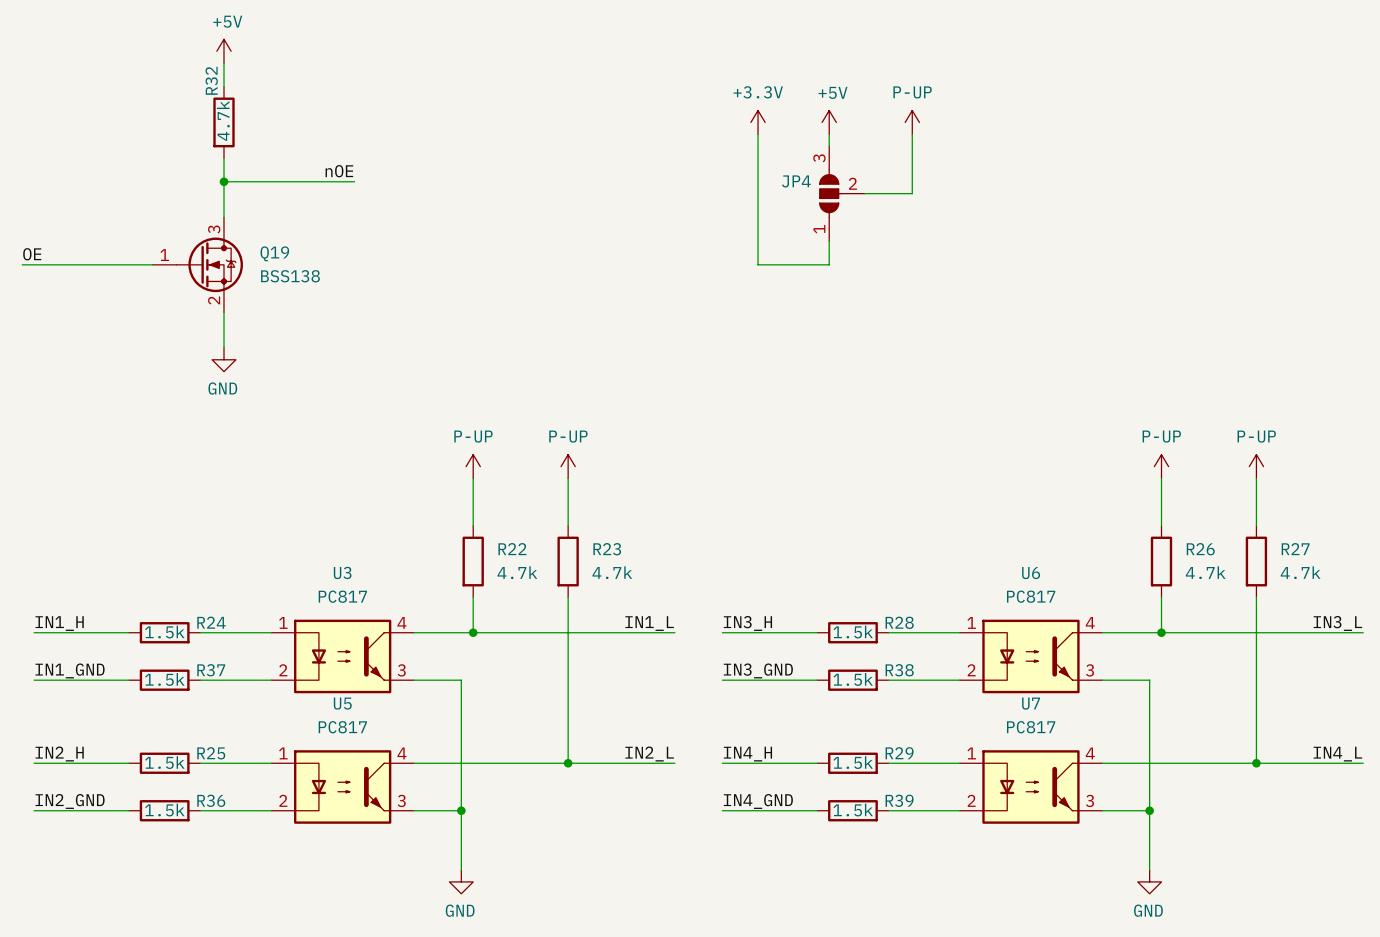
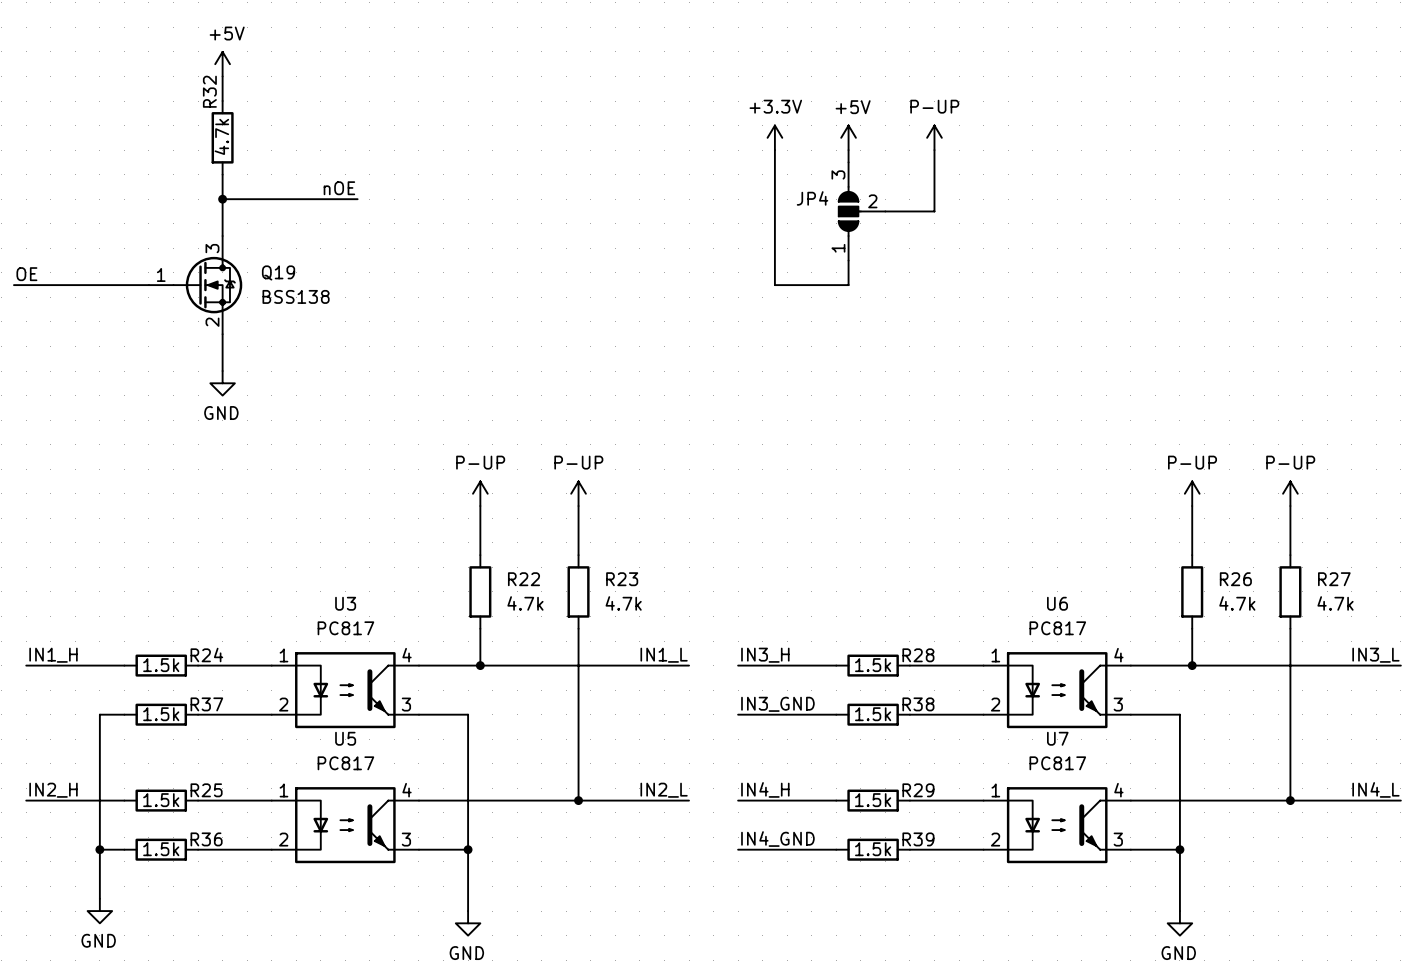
label: IN1_GND (70, 670) -> none
wire: (34, 680) (105, 680) -> (99, 898) (99, 714)
label: IN2_GND (70, 801) -> none
wire: (34, 810) (105, 810) -> none
junction: none -> (99, 849)
power symbol: none -> GND (99, 911)

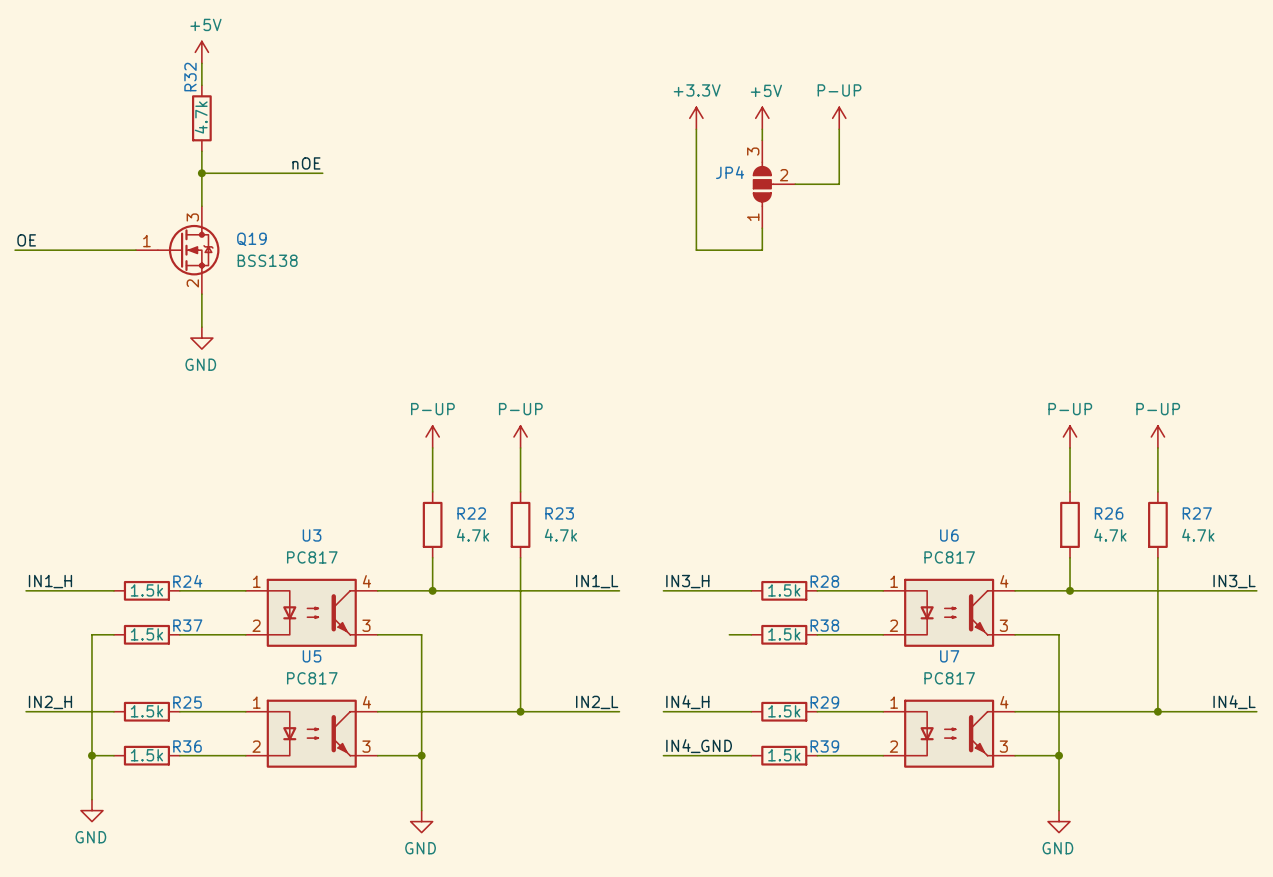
label: IN3_GND (777, 704) -> none
wire: (738, 714) (811, 714) -> none

